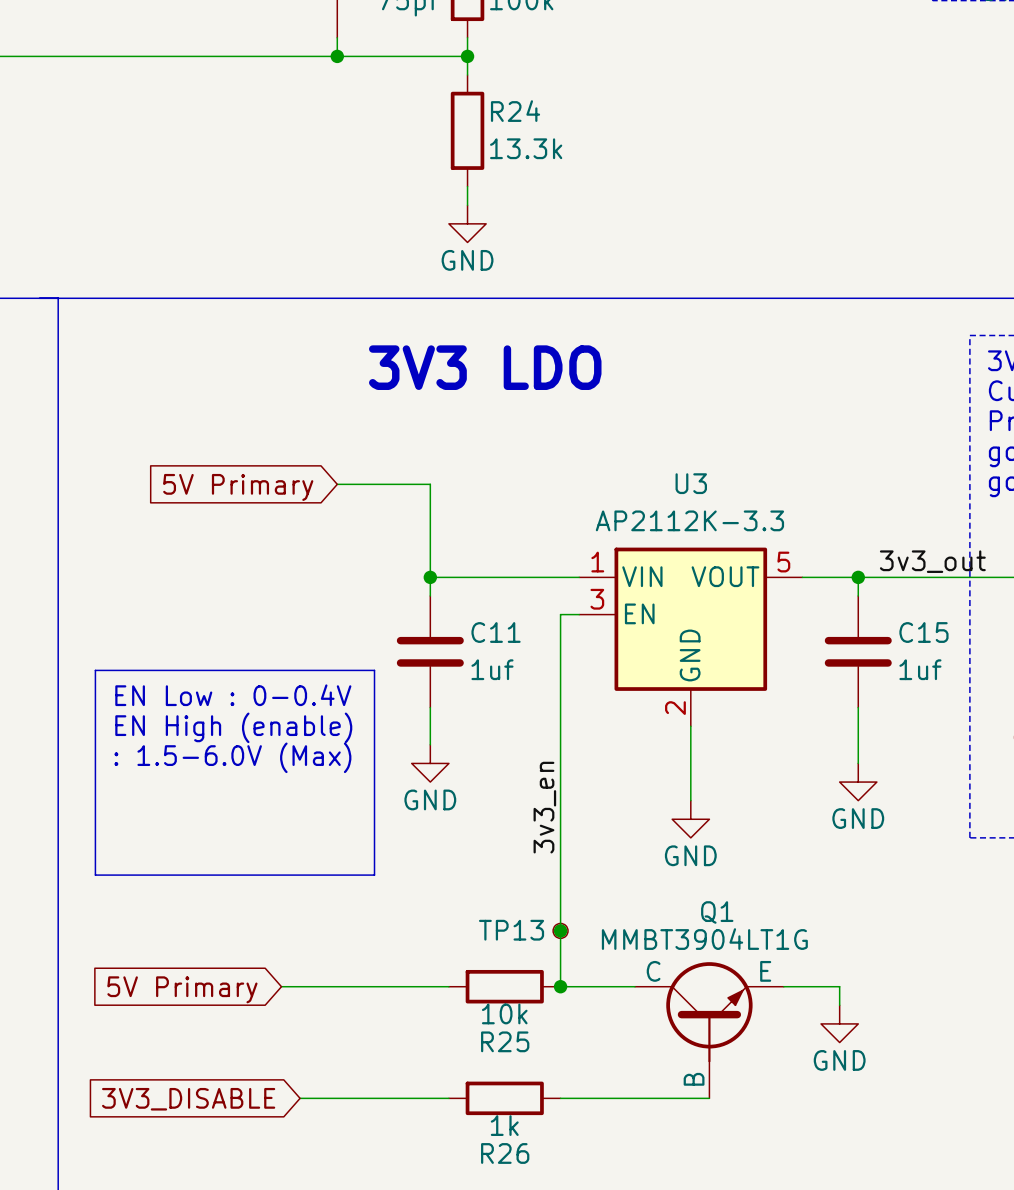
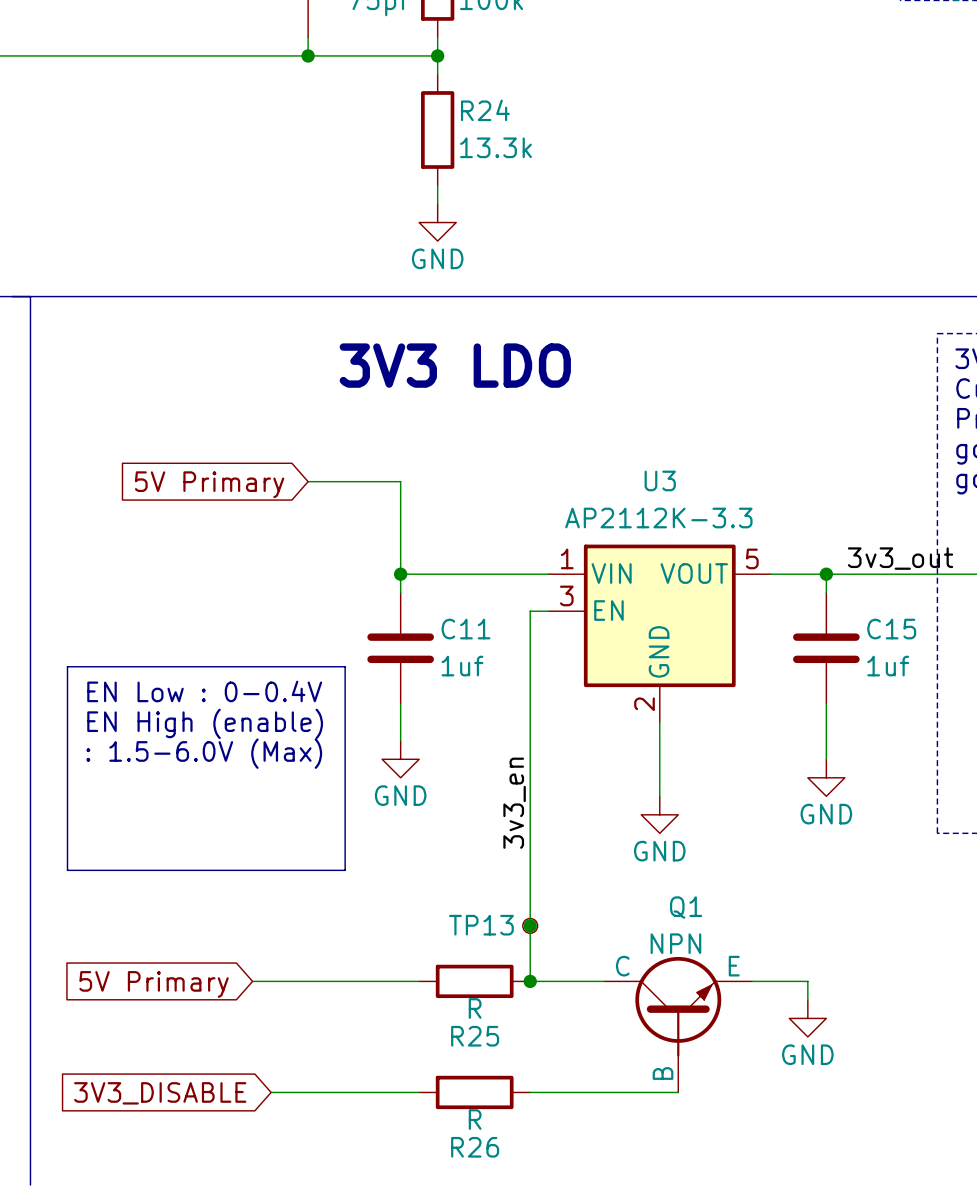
Q1 value: MMBT3904LT1G (704, 939) -> NPN (675, 943)
R25 value: 10k (504, 1013) -> R (475, 1008)
R26 value: 1k (504, 1125) -> R (475, 1119)

